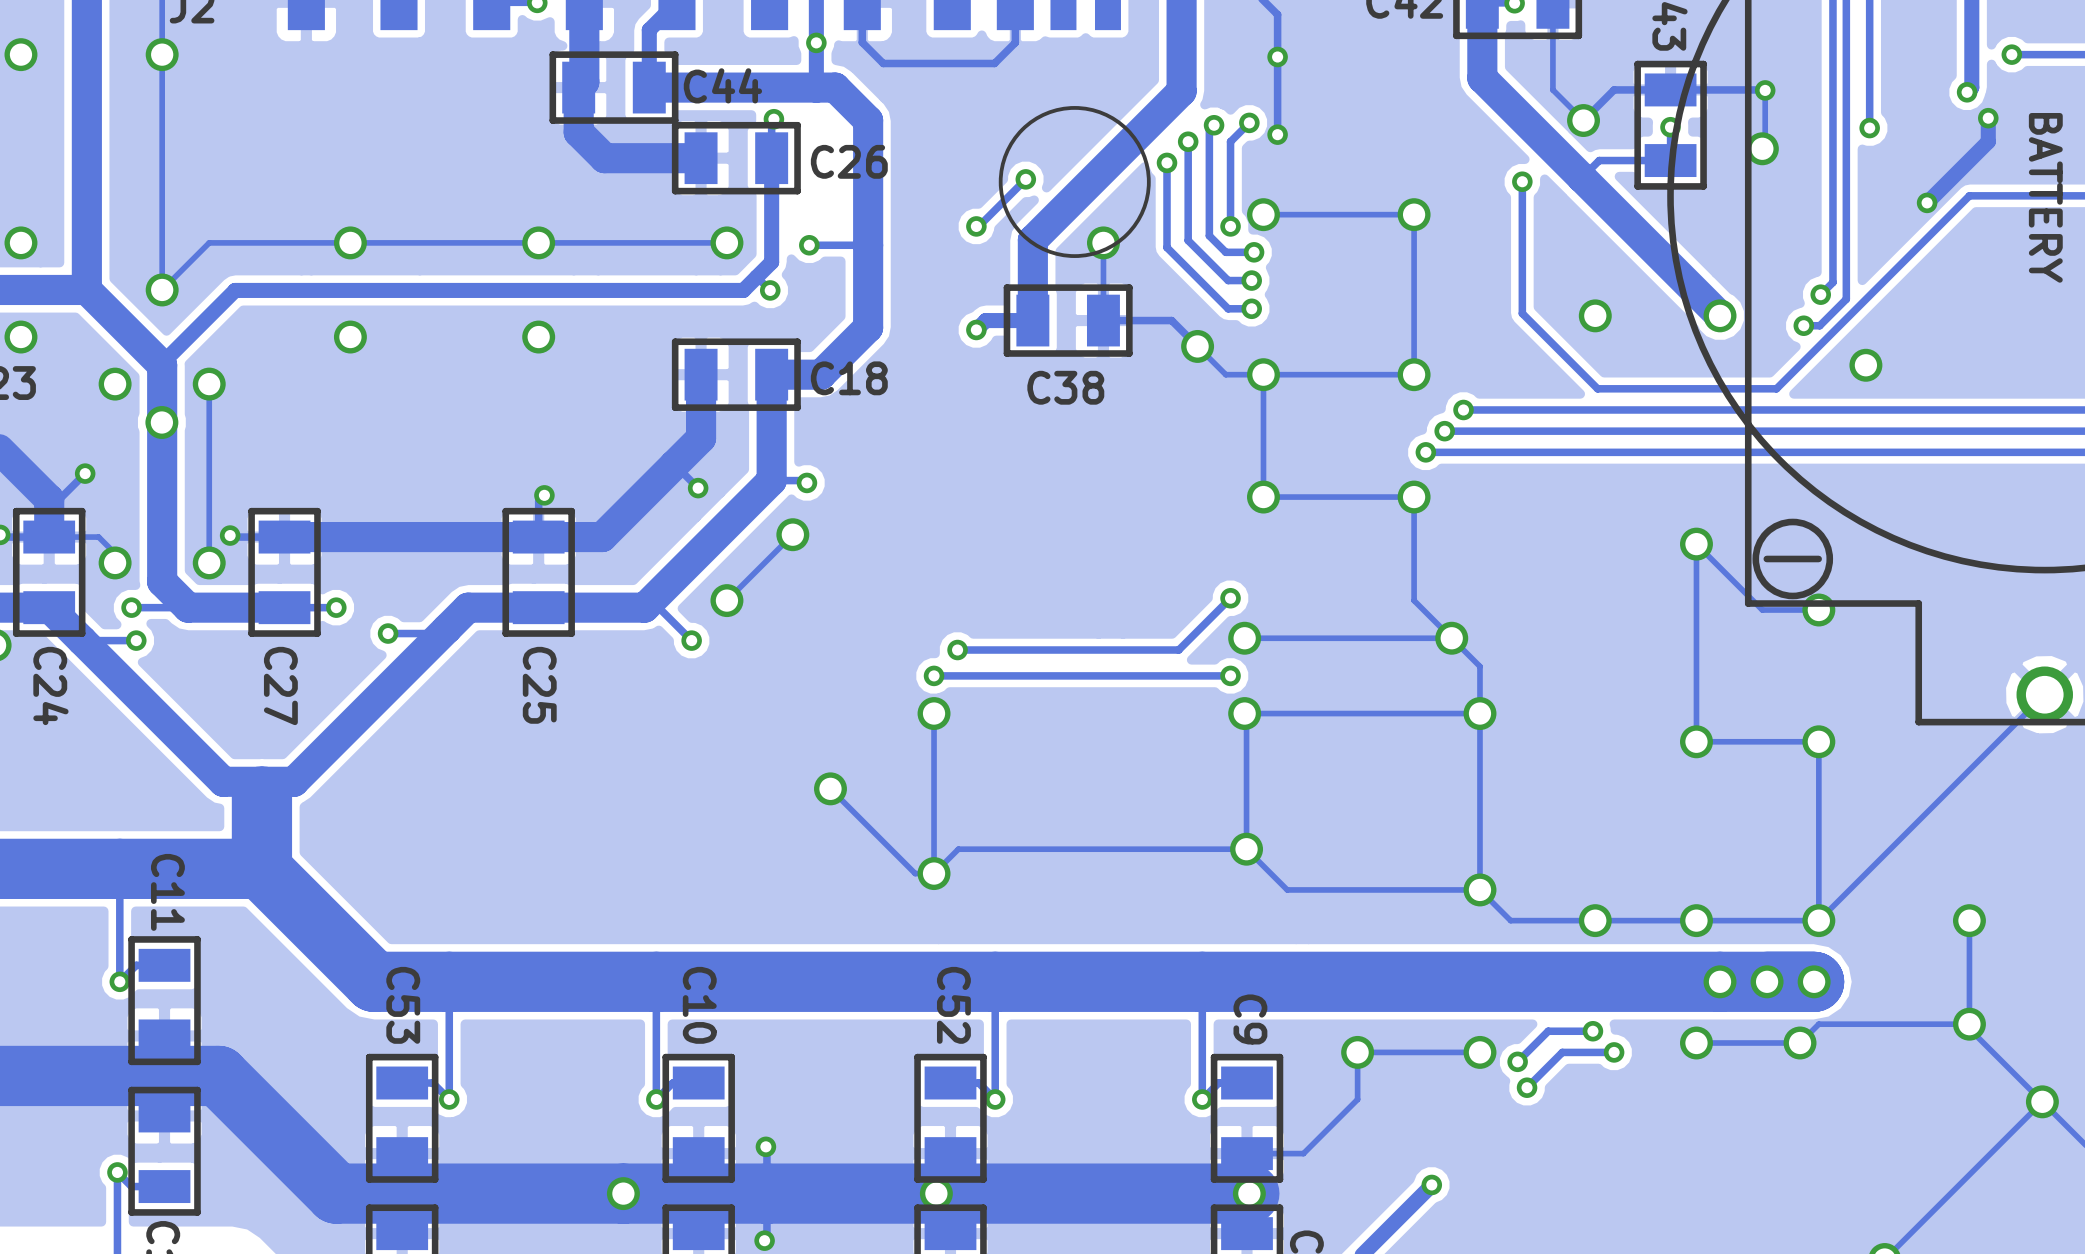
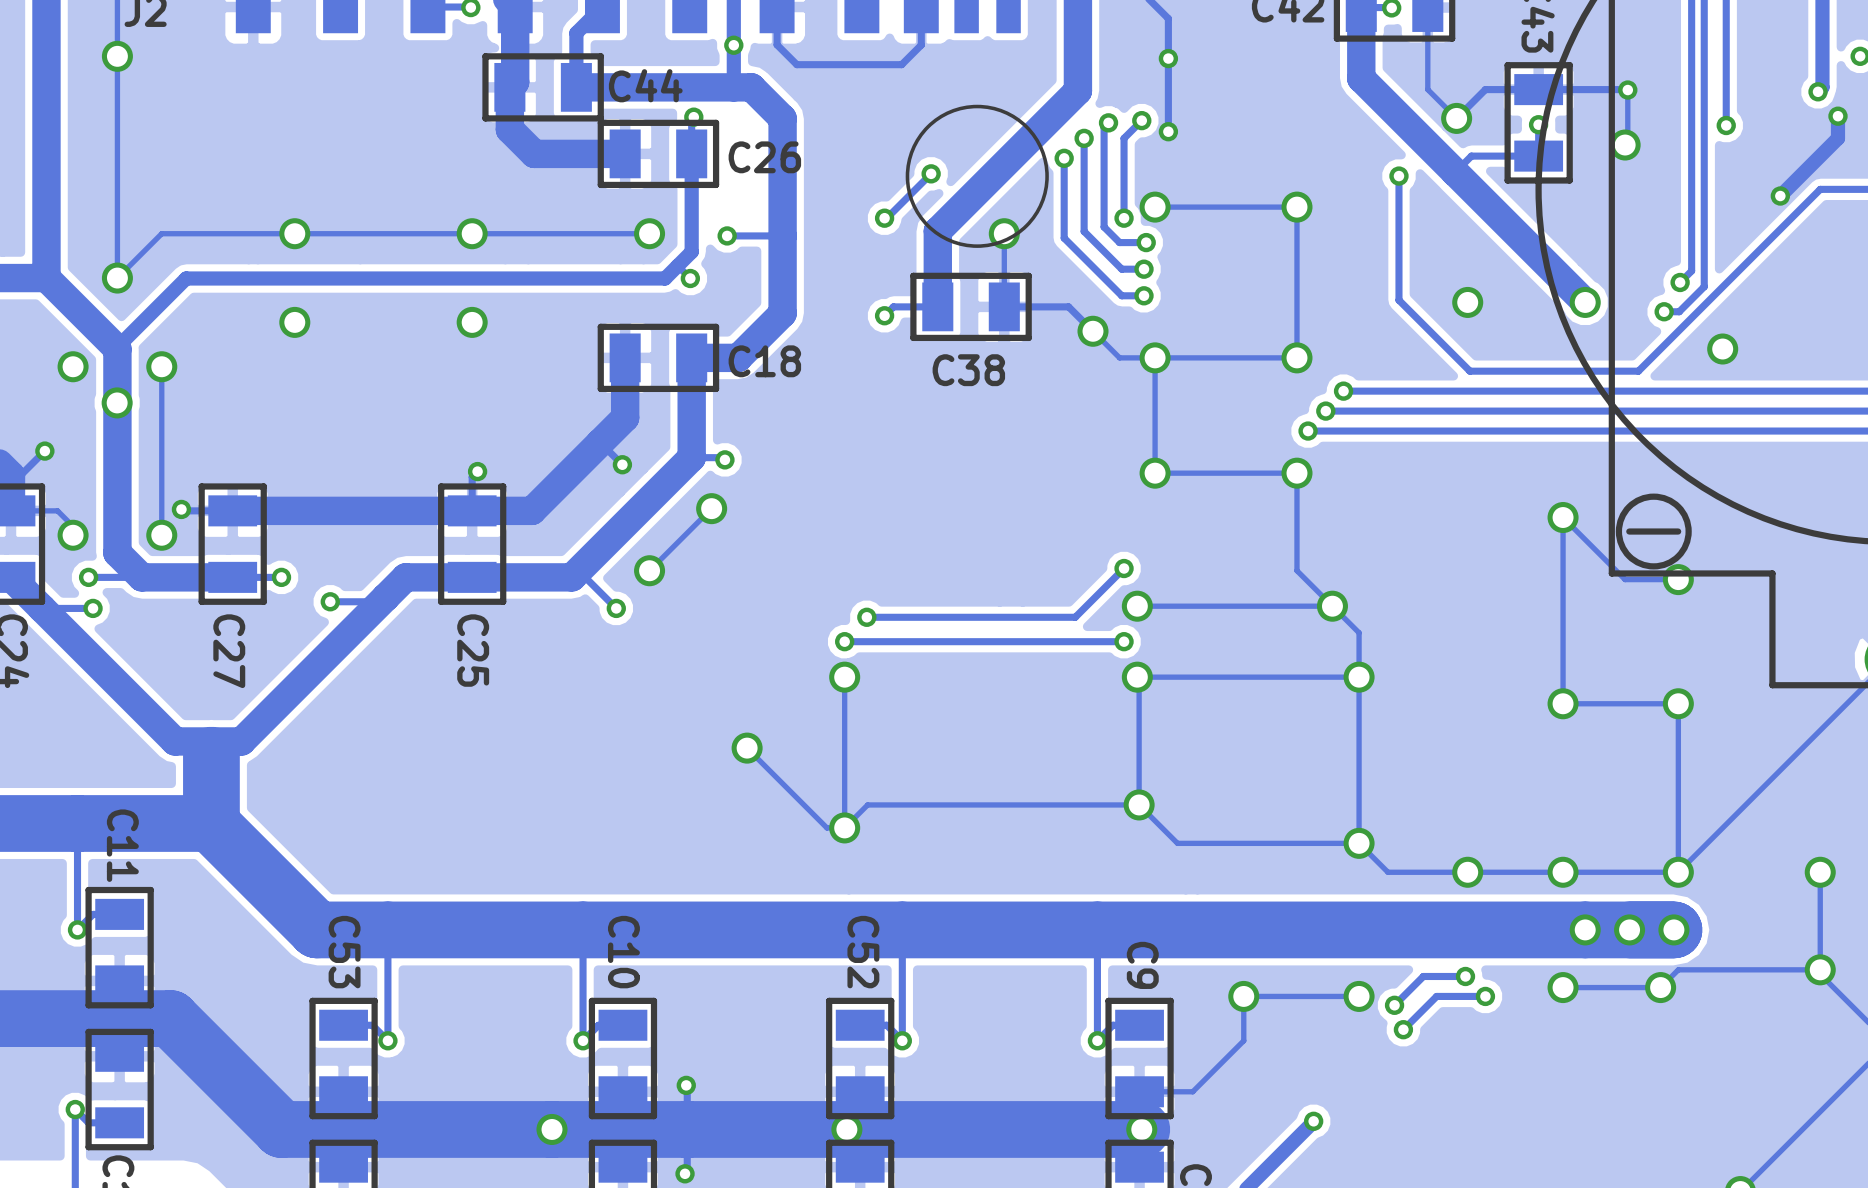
track width: thick (1032, 320) (985, 320) (976, 329) -> thin (937, 306) (893, 306) (884, 315)

